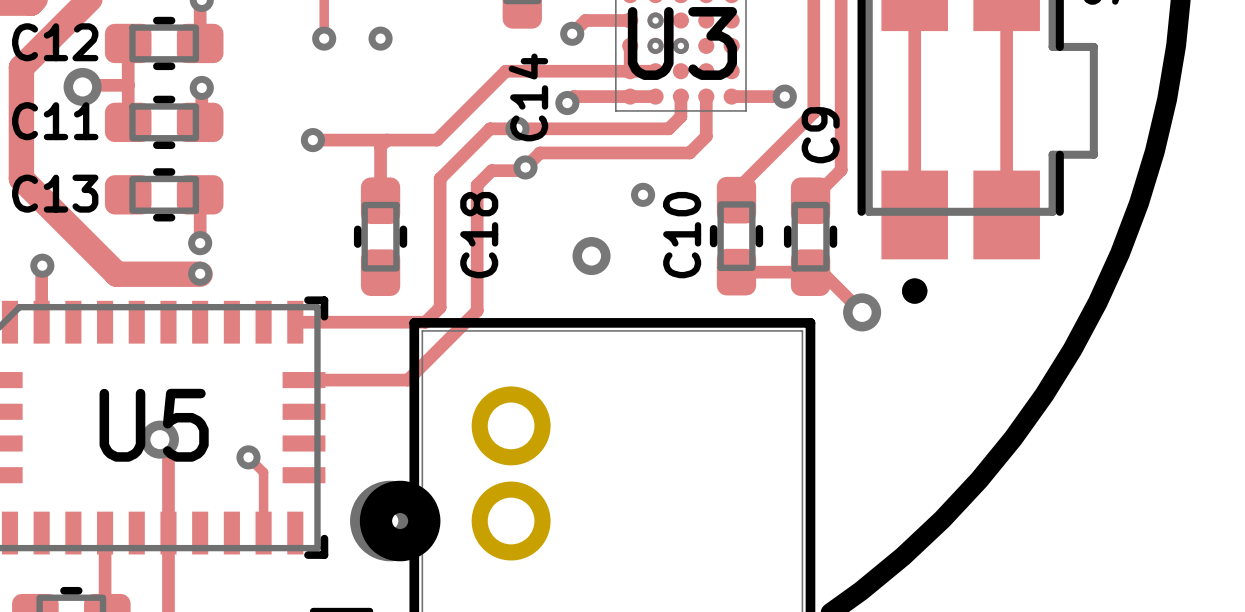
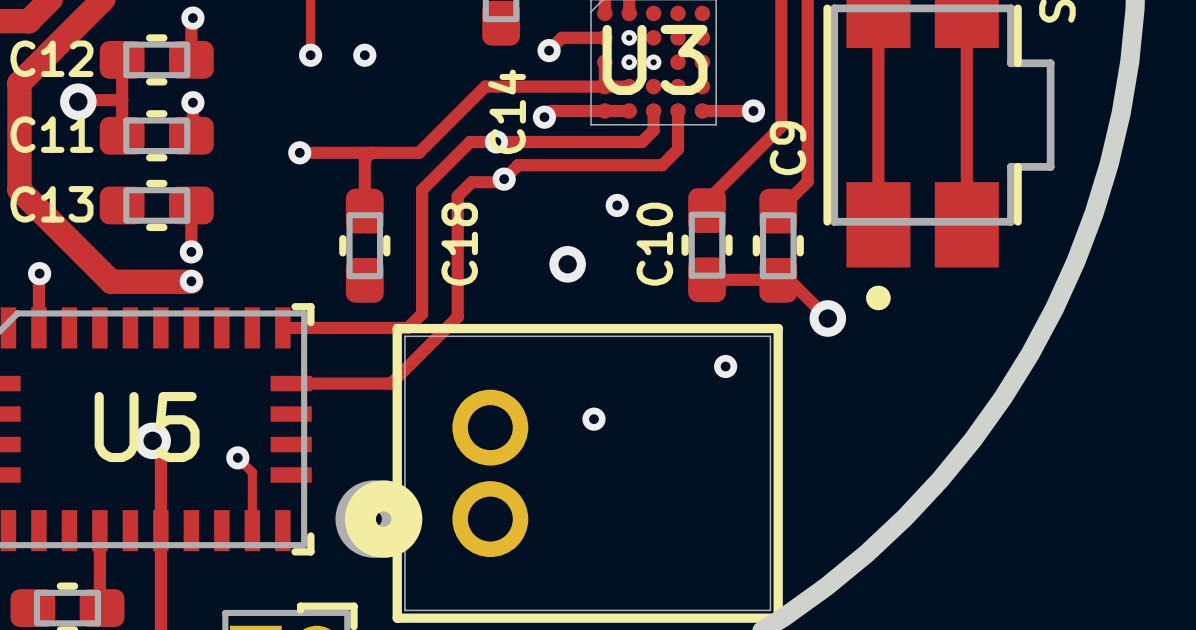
via: none -> (725, 366)
via: none -> (593, 419)

